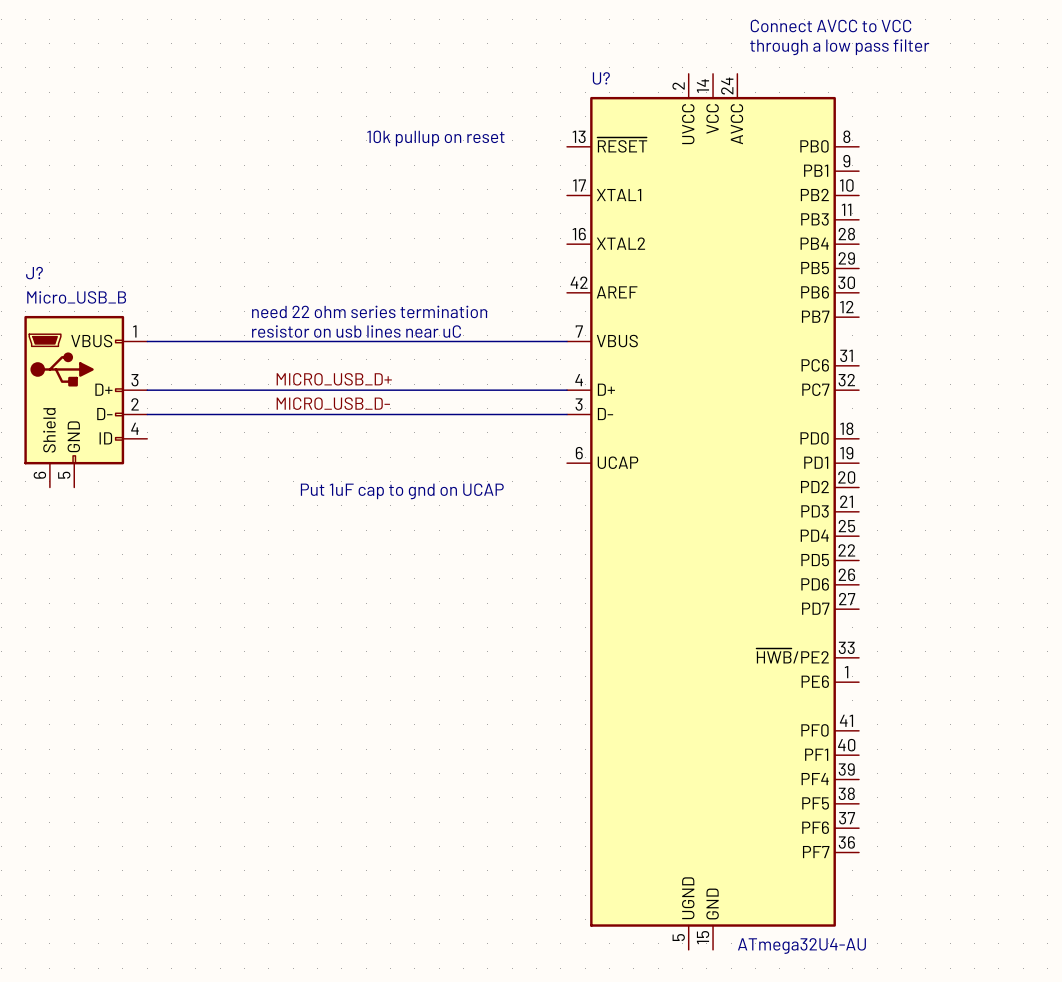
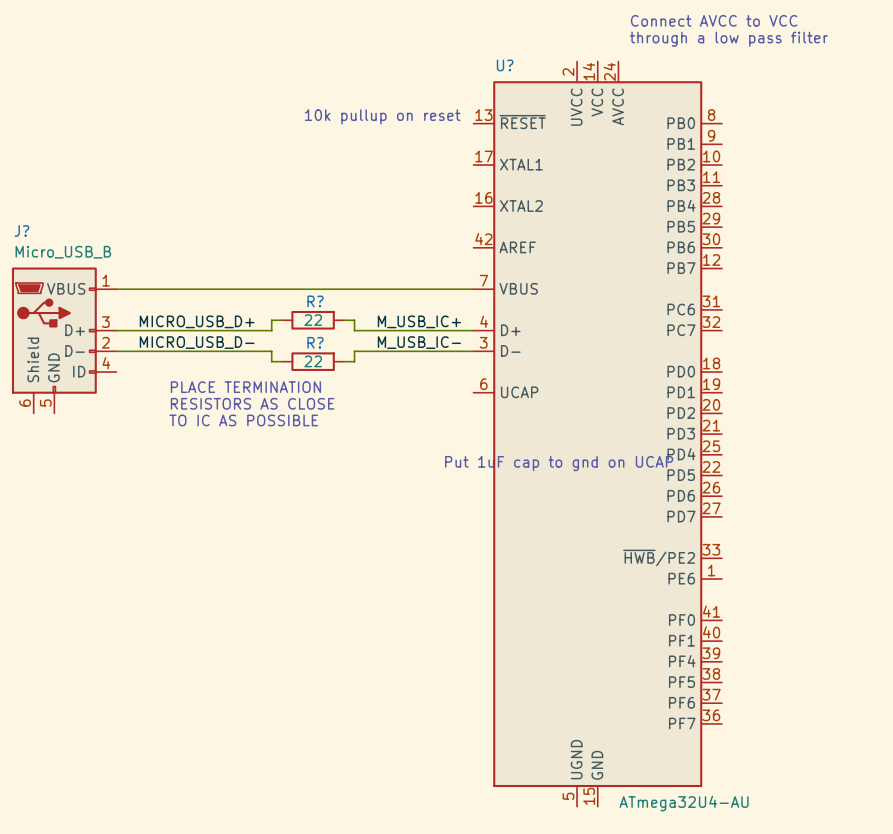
text: need 22 ohm series termination (369, 311) -> none
text: resistor on usb lines near uC (356, 331) -> none
R?: none -> (313, 320)
wire: none -> (344, 320) (354, 320) (354, 330)
label position: MICRO_USB_D+ (334, 379) -> MICRO_USB_D+ (197, 321)
label: none -> M_USB_IC+ (419, 321)
wire: (329, 390) (427, 390) -> (271, 330) (271, 320) (282, 320)
label position: MICRO_USB_D- (333, 403) -> MICRO_USB_D- (197, 342)
label: none -> M_USB_IC- (419, 342)
wire: (329, 414) (427, 414) -> (271, 351) (271, 361) (282, 361)
wire: none -> (354, 351) (354, 361) (344, 361)
R?: none -> (313, 361)
text: none -> PLACE TERMINATION (245, 387)
text: none -> RESISTORS AS CLOSE (252, 403)
text position: Put 1uF cap to gnd on UCAP (402, 491) -> Put 1uF cap to gnd on UCAP (559, 463)
text: none -> TO IC AS POSSIBLE (243, 420)

